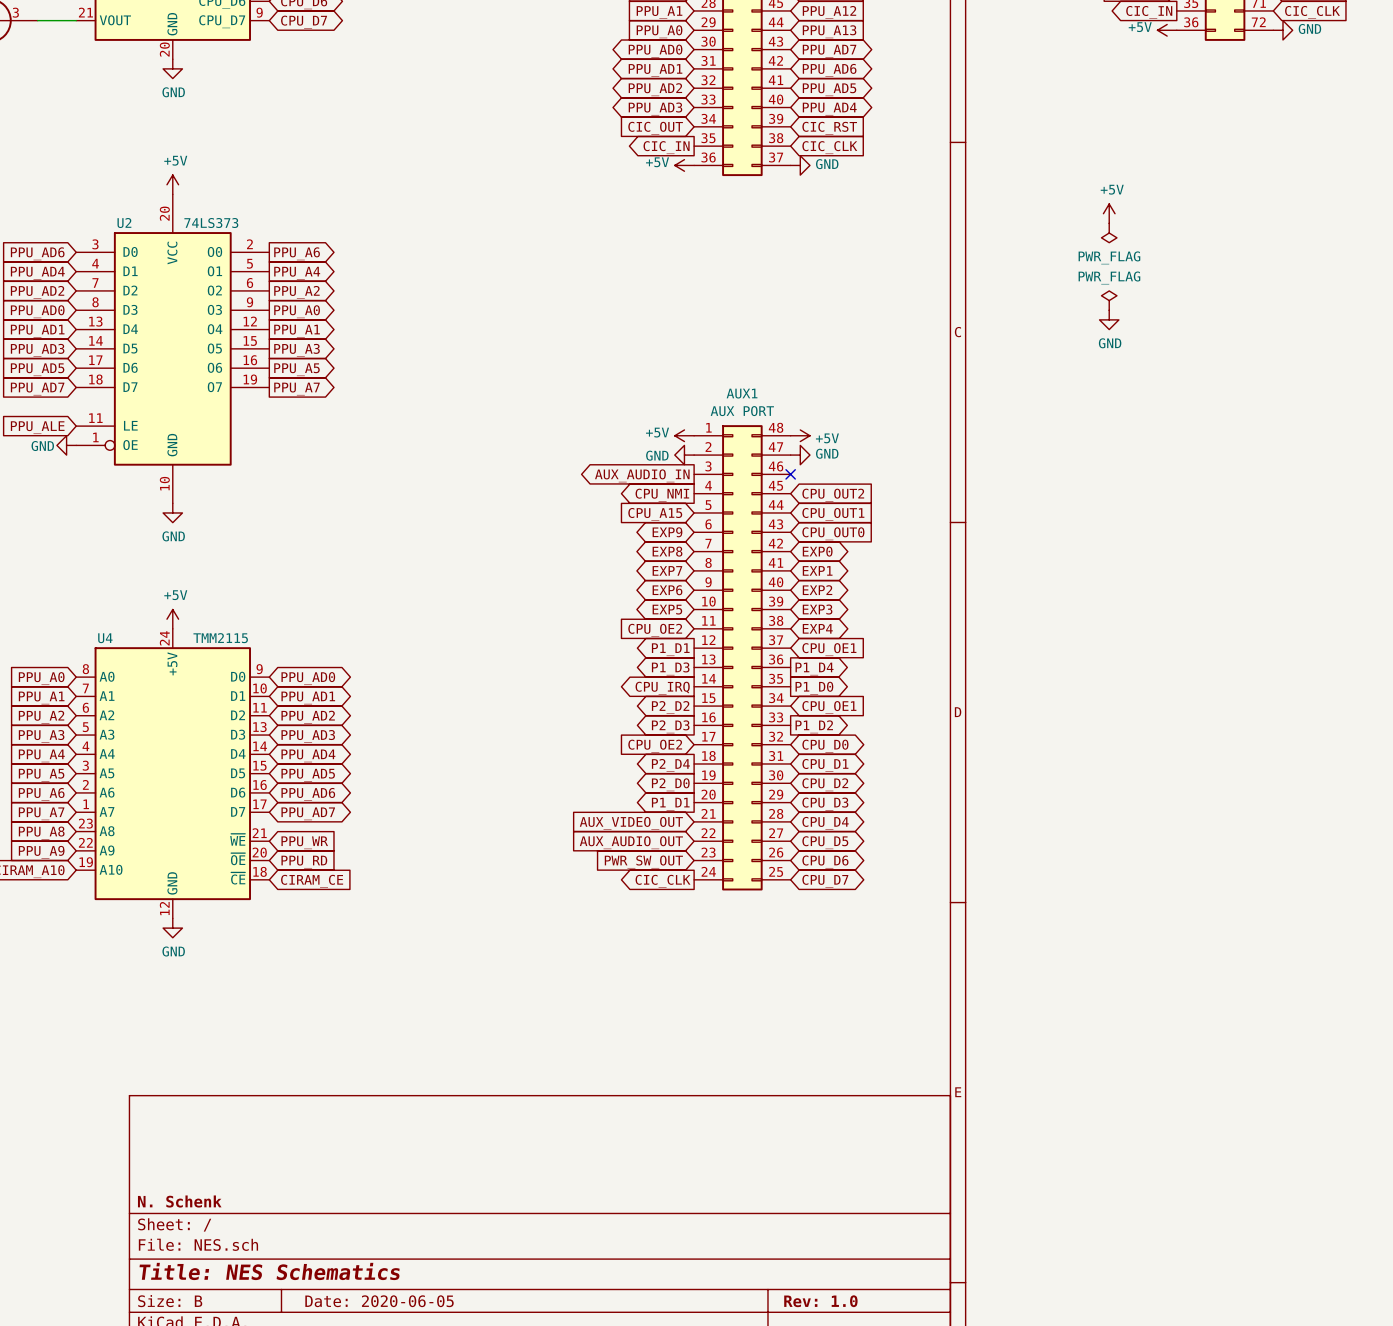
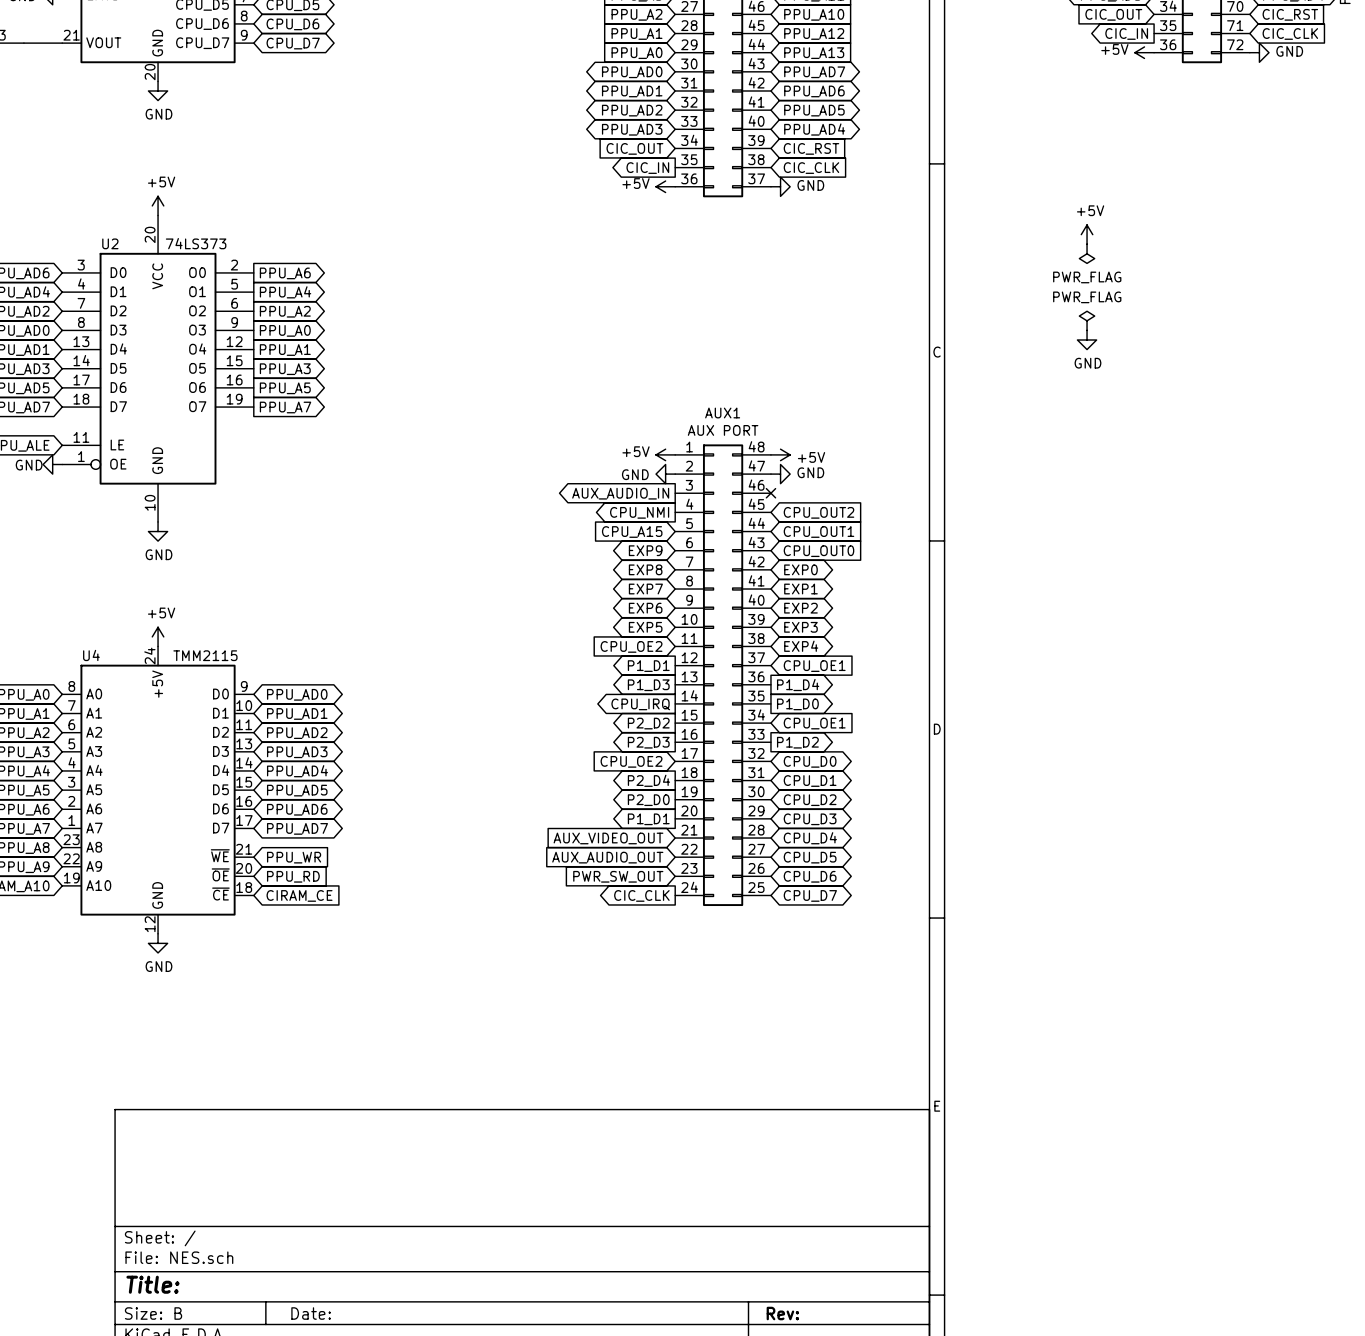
title block: N. Schenk (179, 1201) -> none
title block: Title: NES Schematics (269, 1271) -> Title: (152, 1284)
title block: Date: 2020-06-05 (379, 1301) -> Date: (311, 1313)
title block: Rev: 1.0 (820, 1301) -> Rev: (782, 1313)

